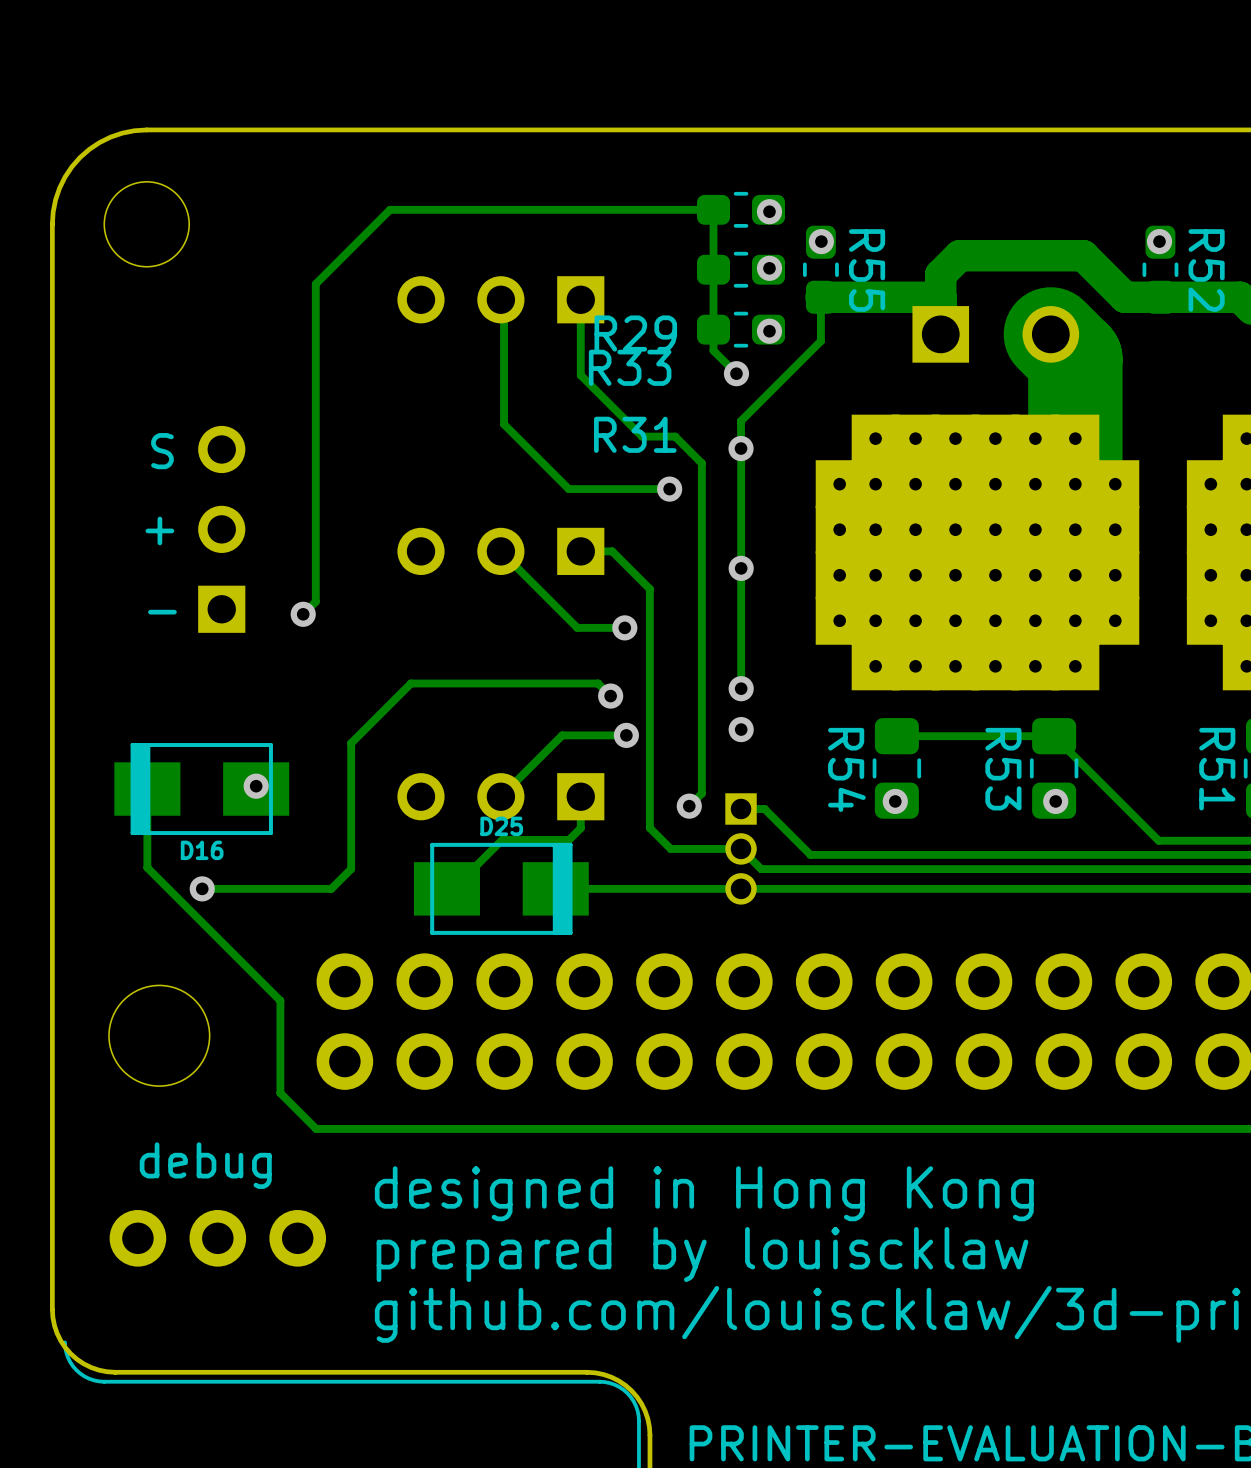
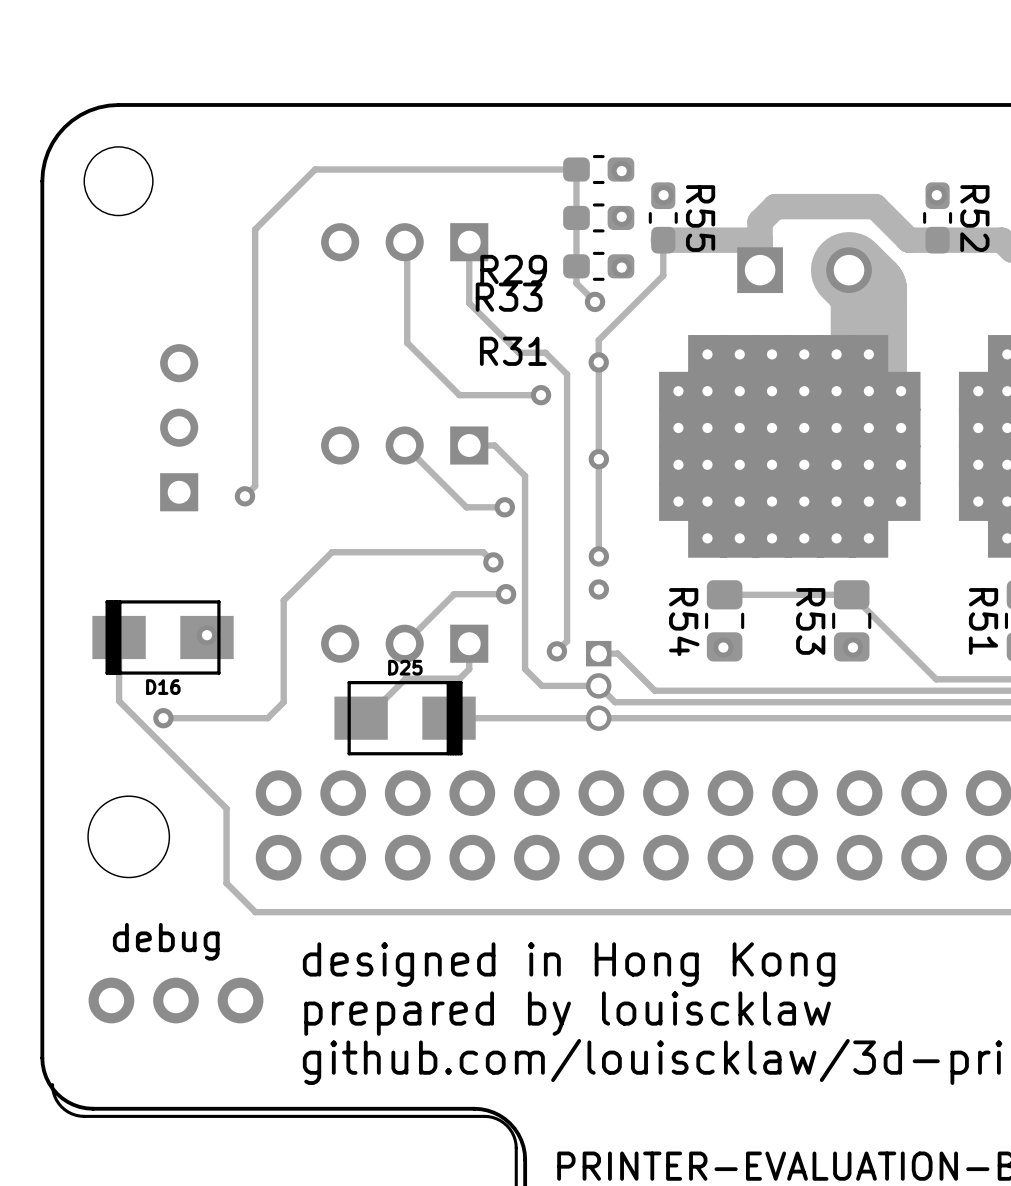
part text: S (162, 451) -> none
part text: + (159, 530) -> none
part text: - (162, 612) -> none

